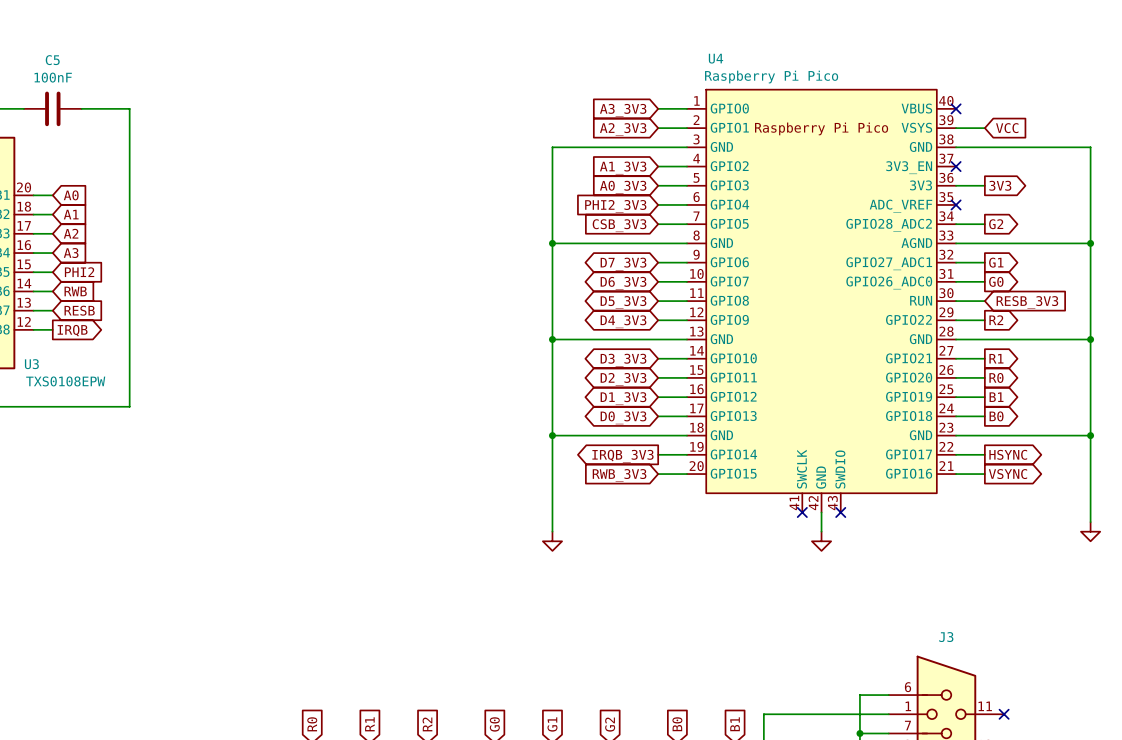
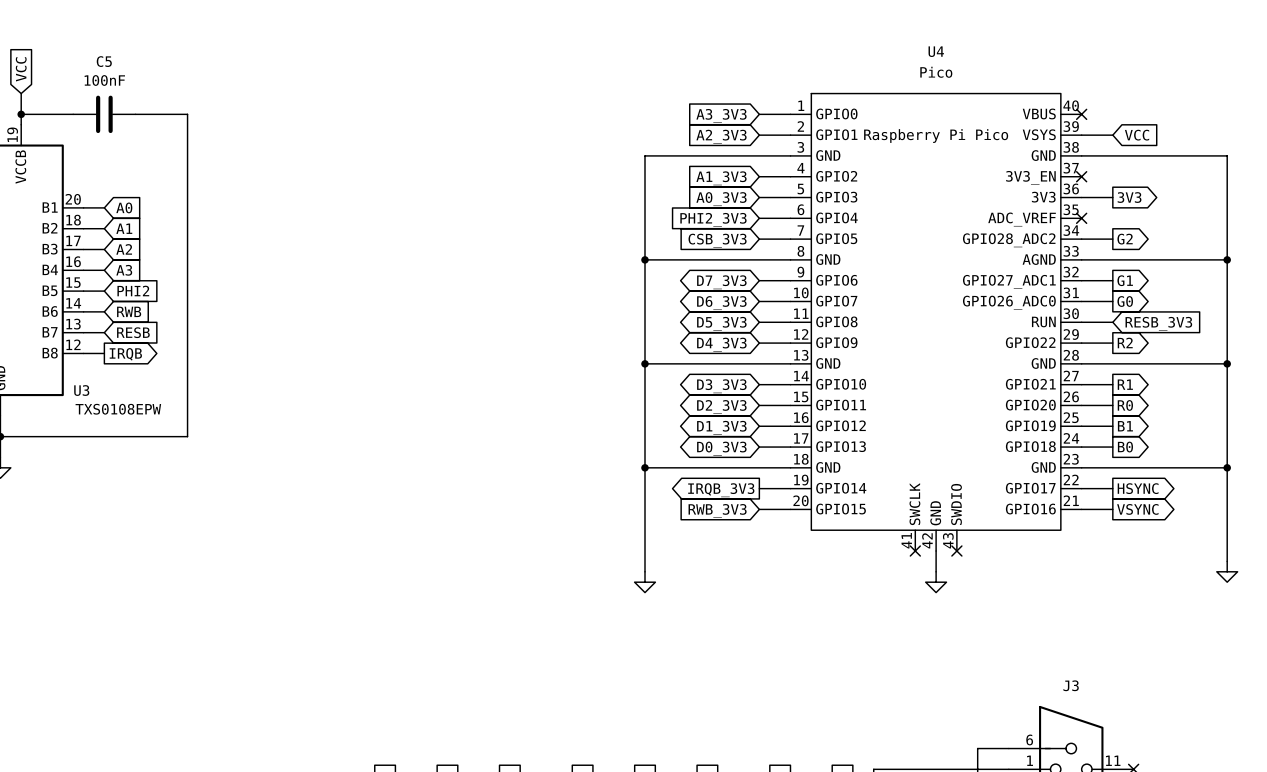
U4 name position: U4 (715, 58) -> U4 (936, 51)
U4 value: Raspberry Pi Pico (771, 77) -> Pico (936, 72)

